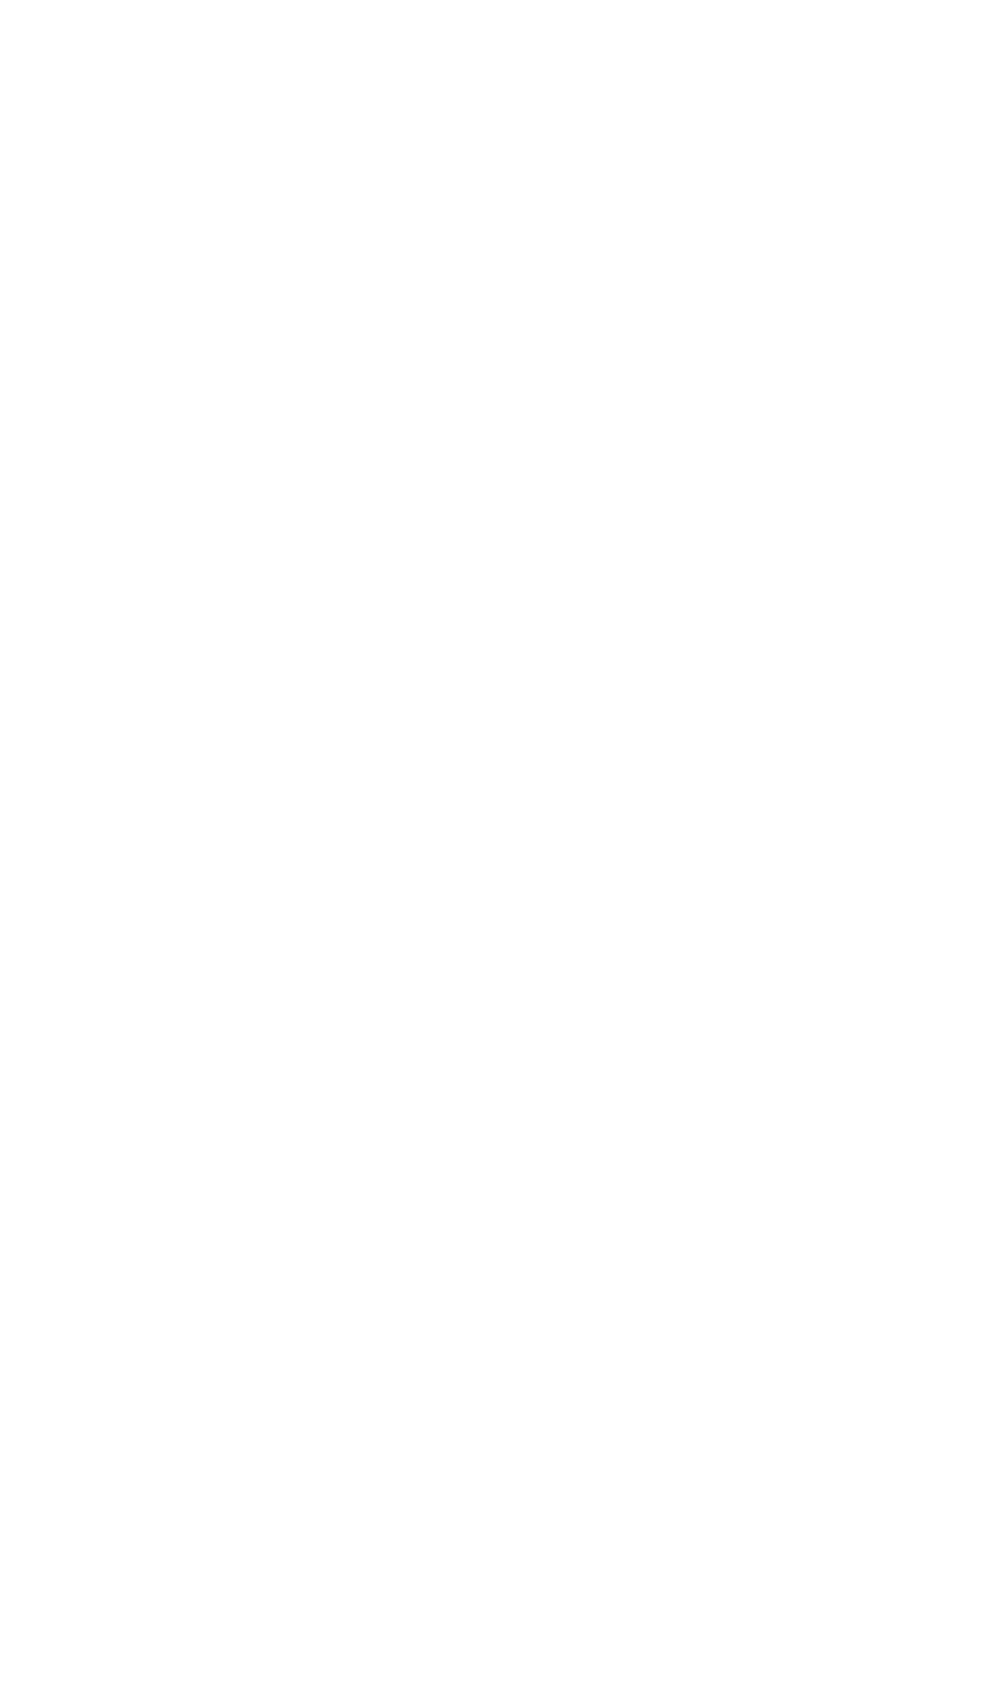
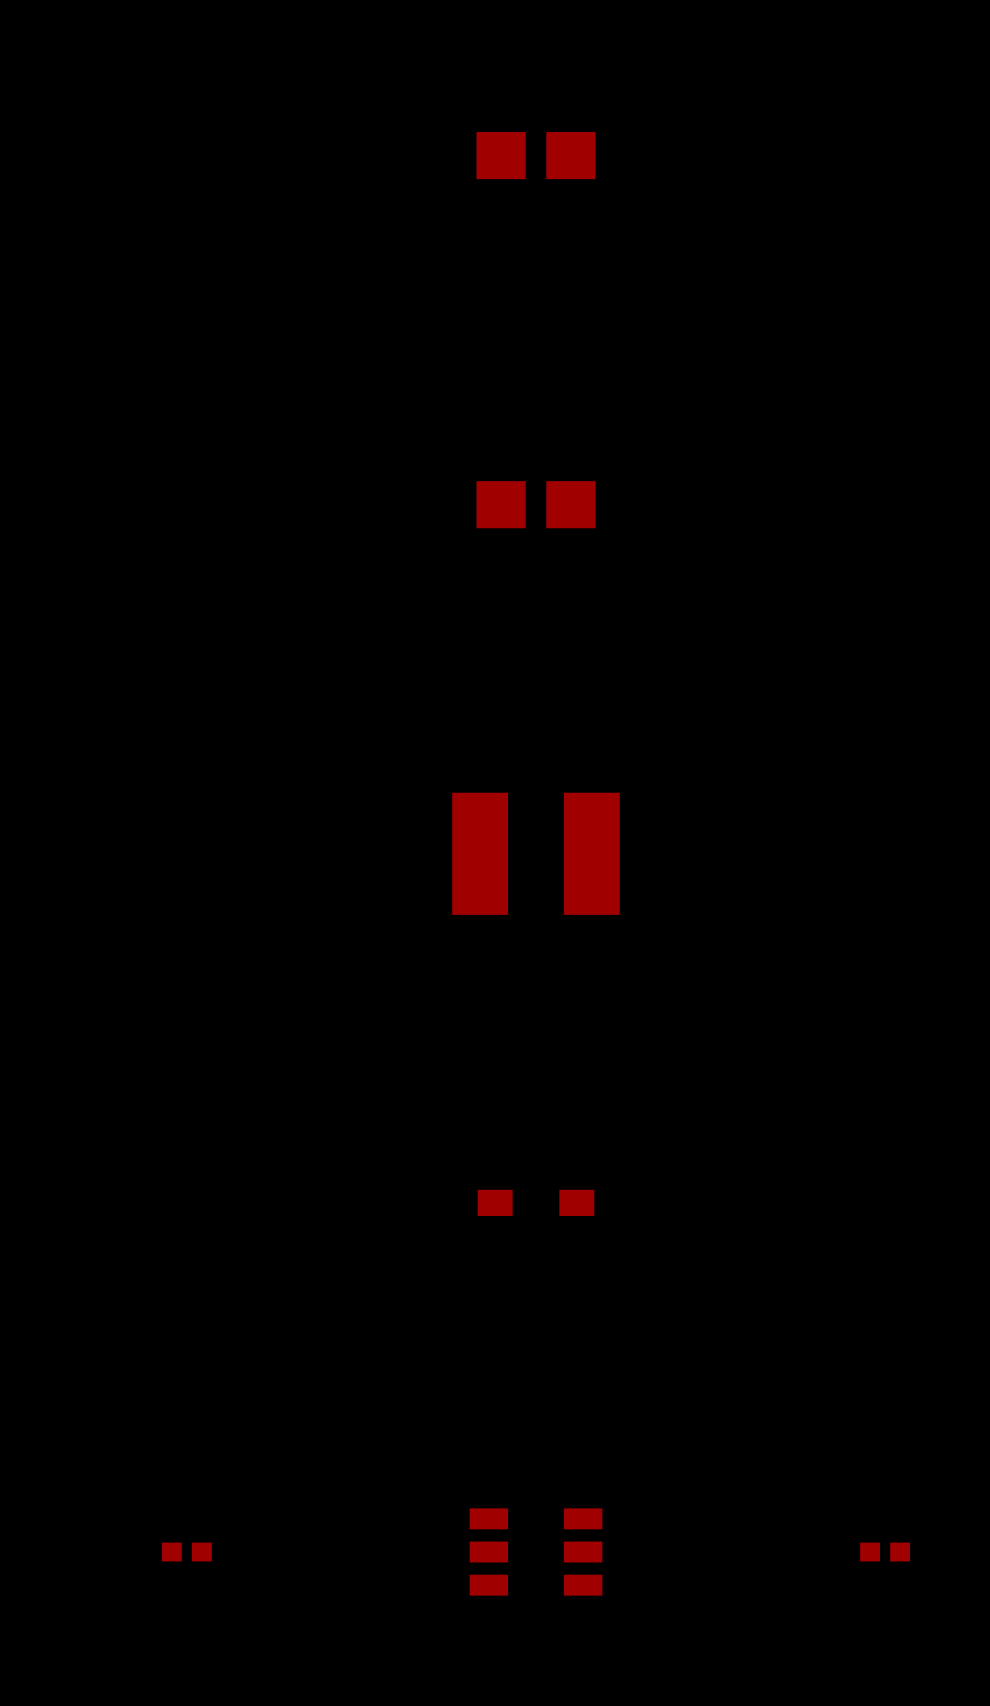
part: none -> (535, 155)
part: none -> (535, 504)
part: none -> (535, 853)
part: none -> (535, 1202)
part: none -> (186, 1552)
part: none -> (535, 1552)
part: none -> (885, 1552)

